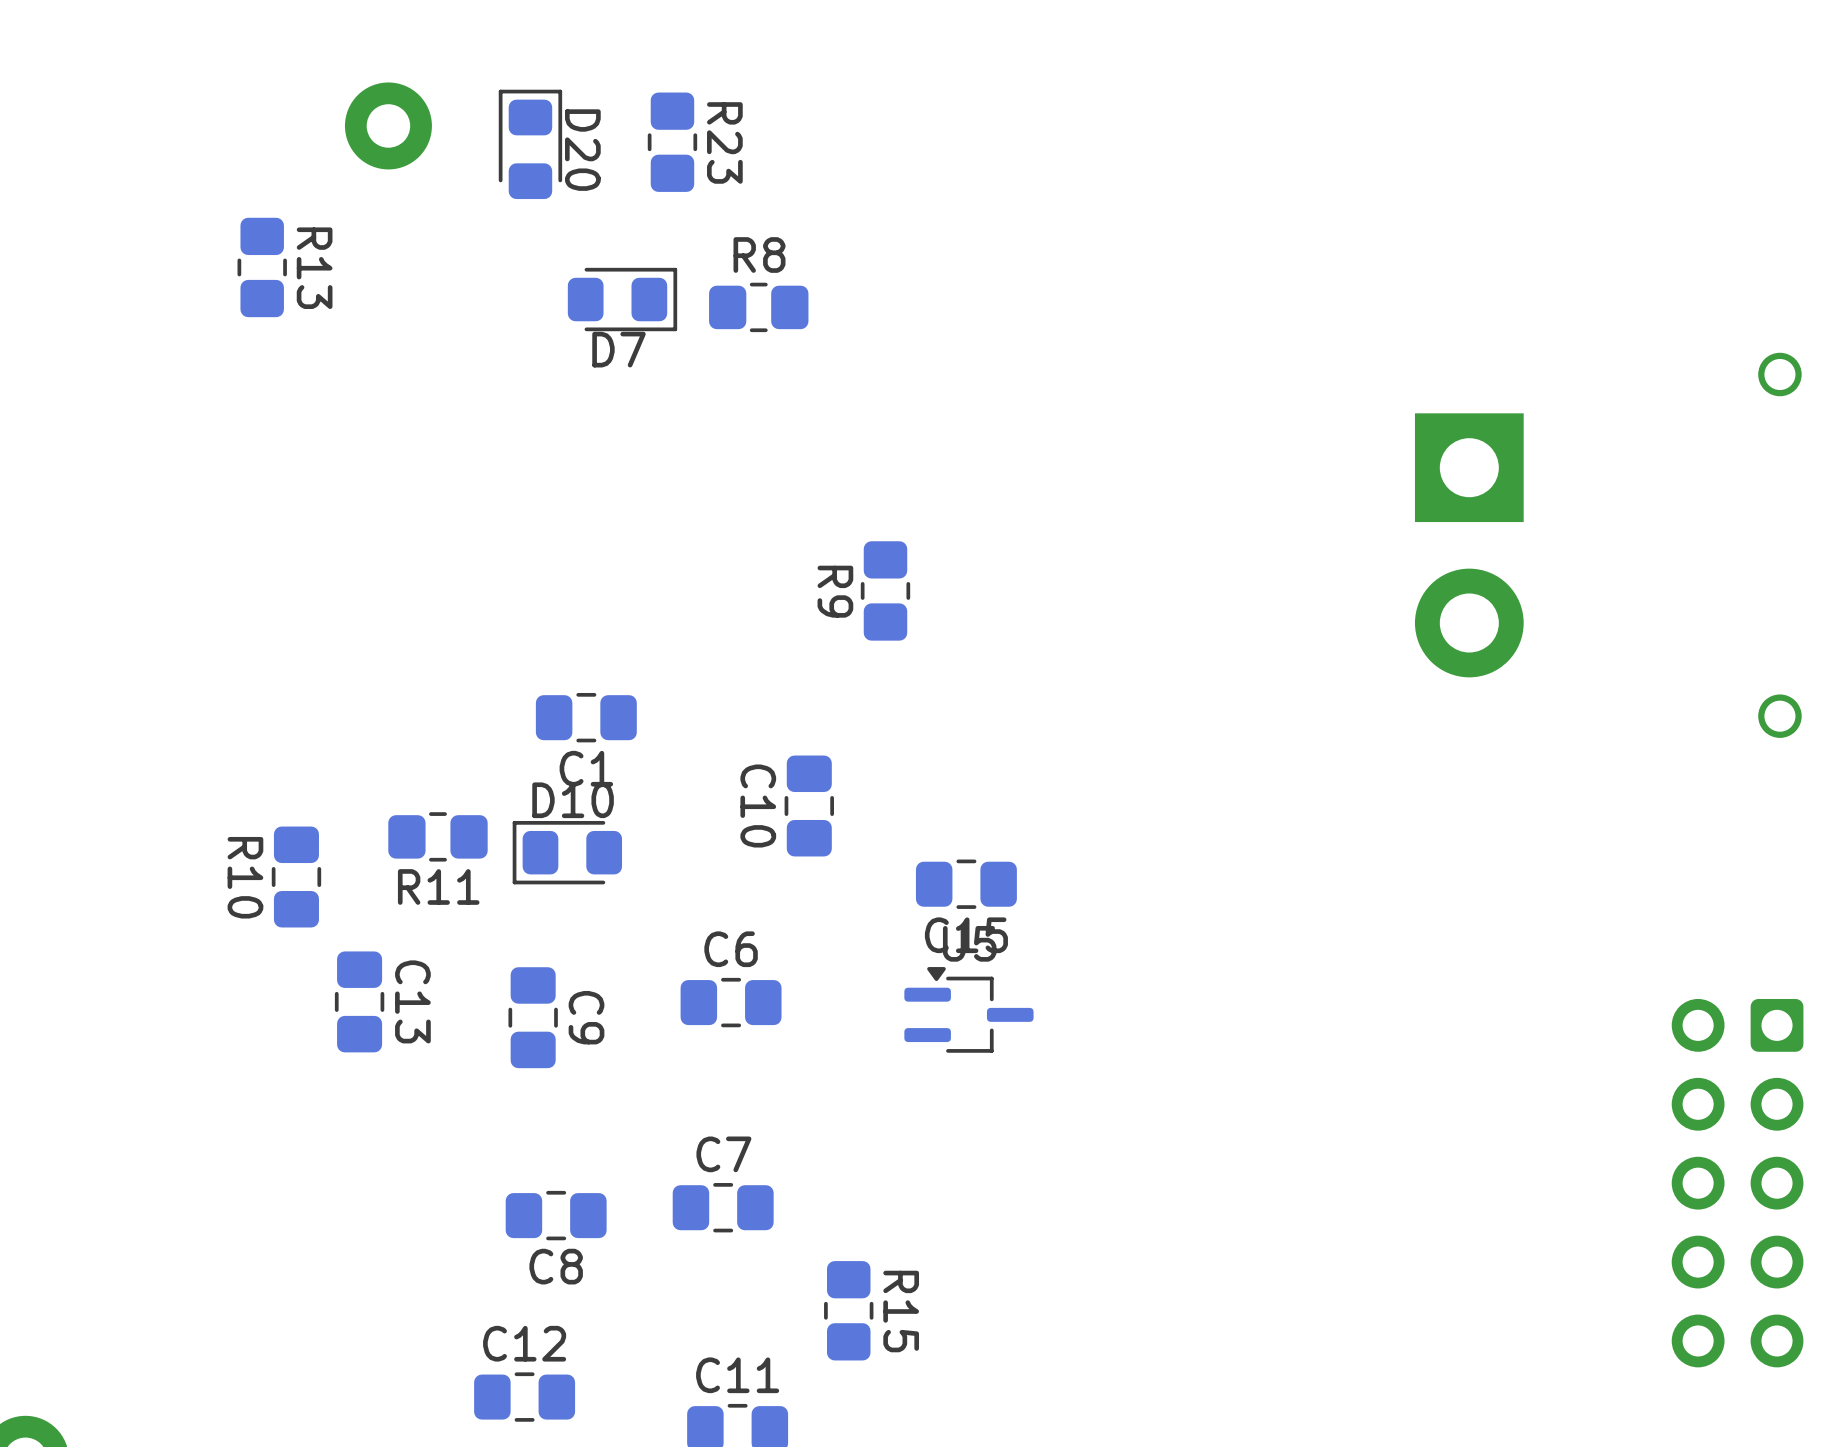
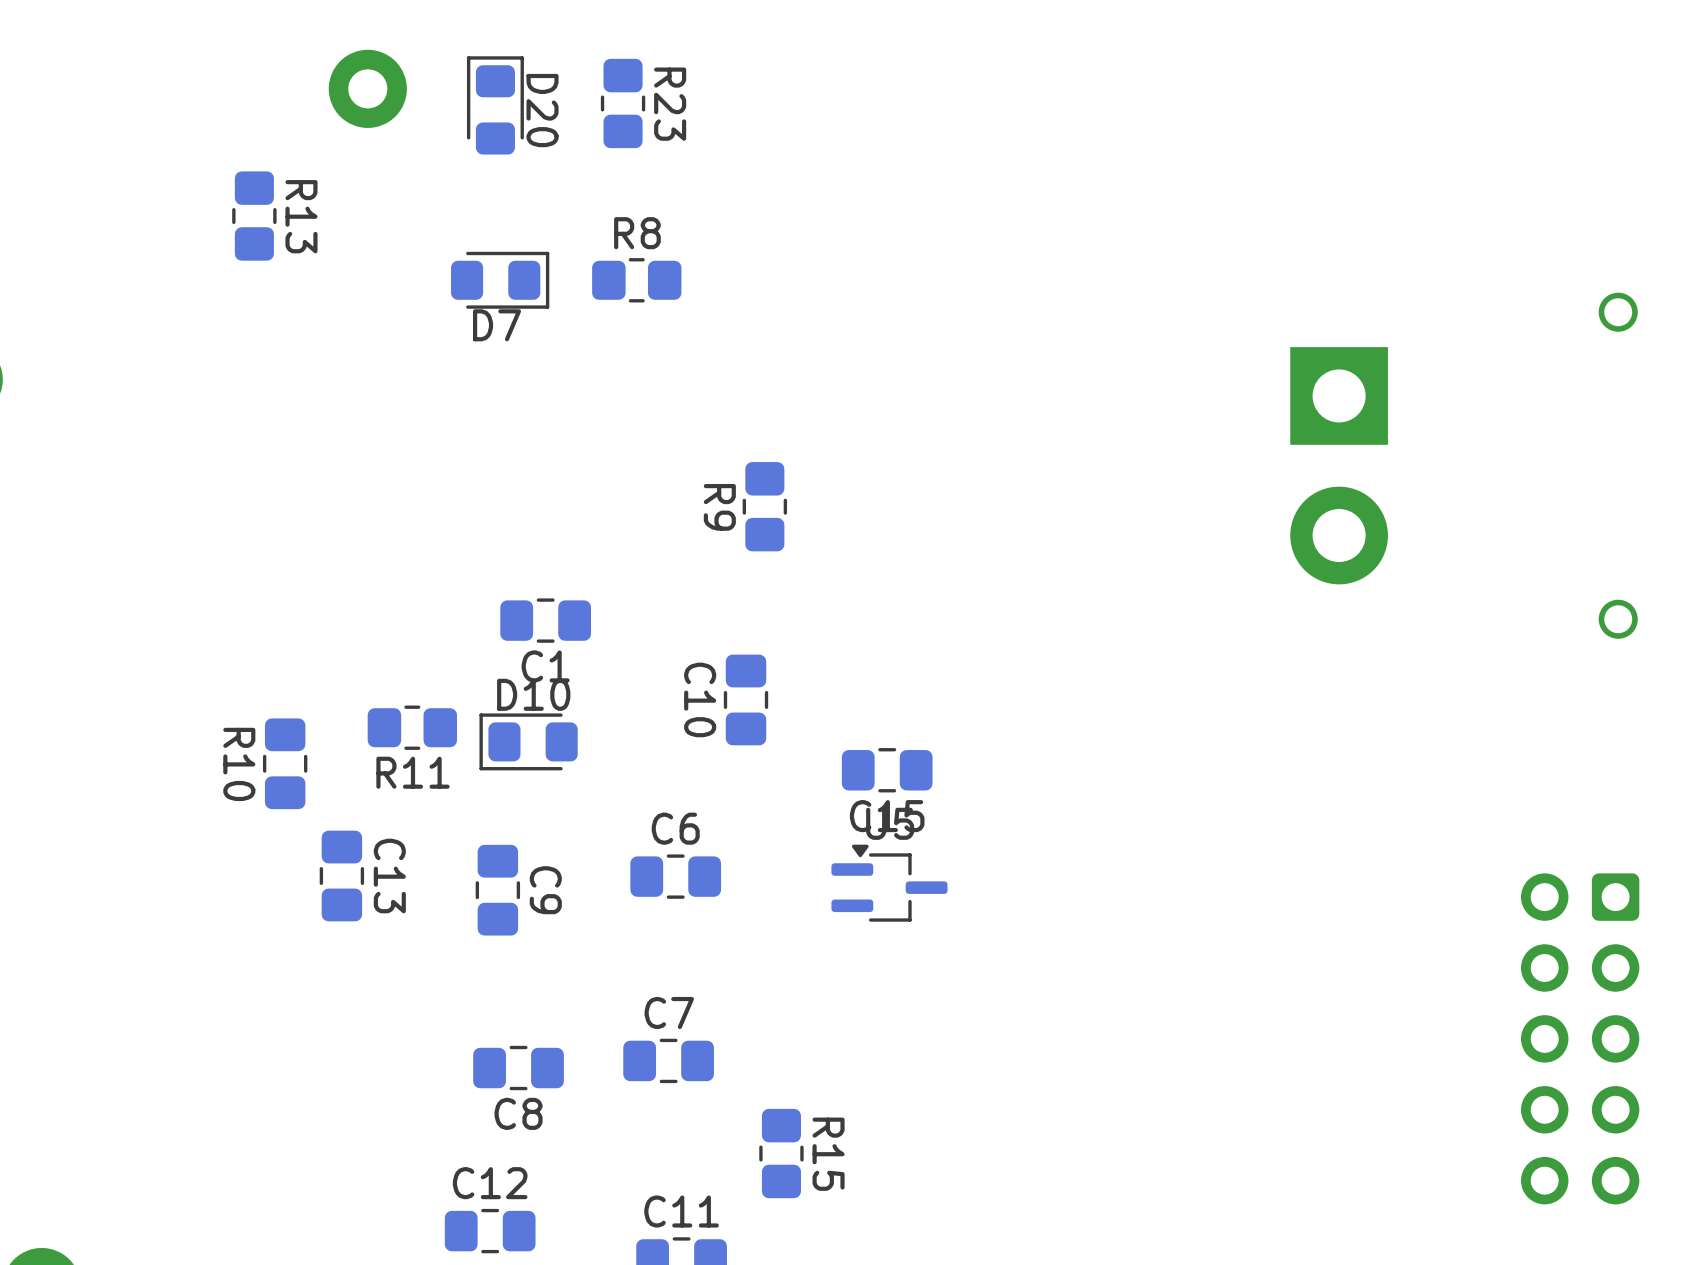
D7 position: (622, 299) -> (500, 280)
R8 position: (758, 307) -> (636, 280)
R9 position: (885, 590) -> (764, 506)

